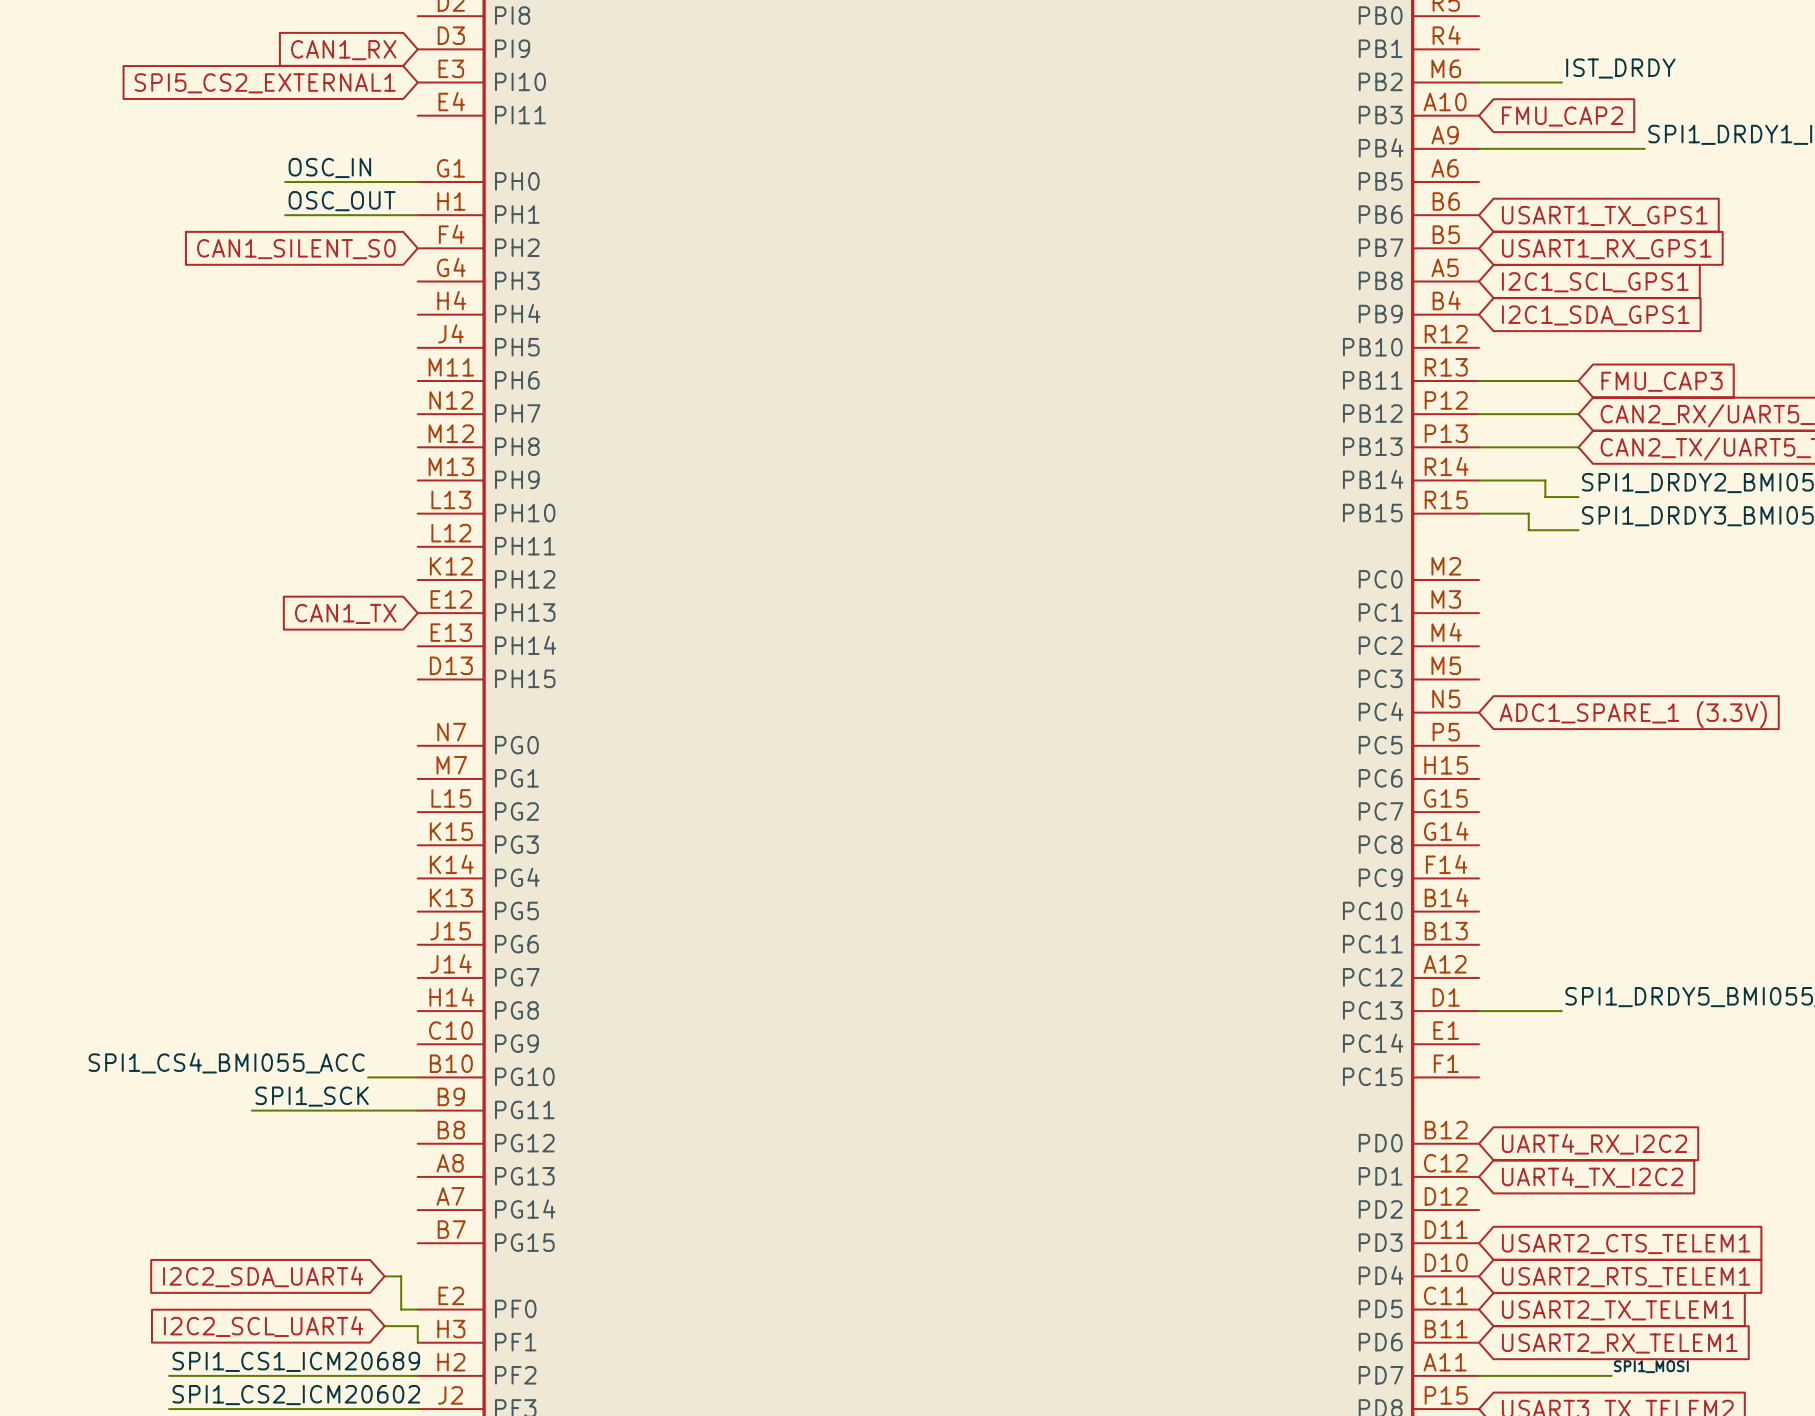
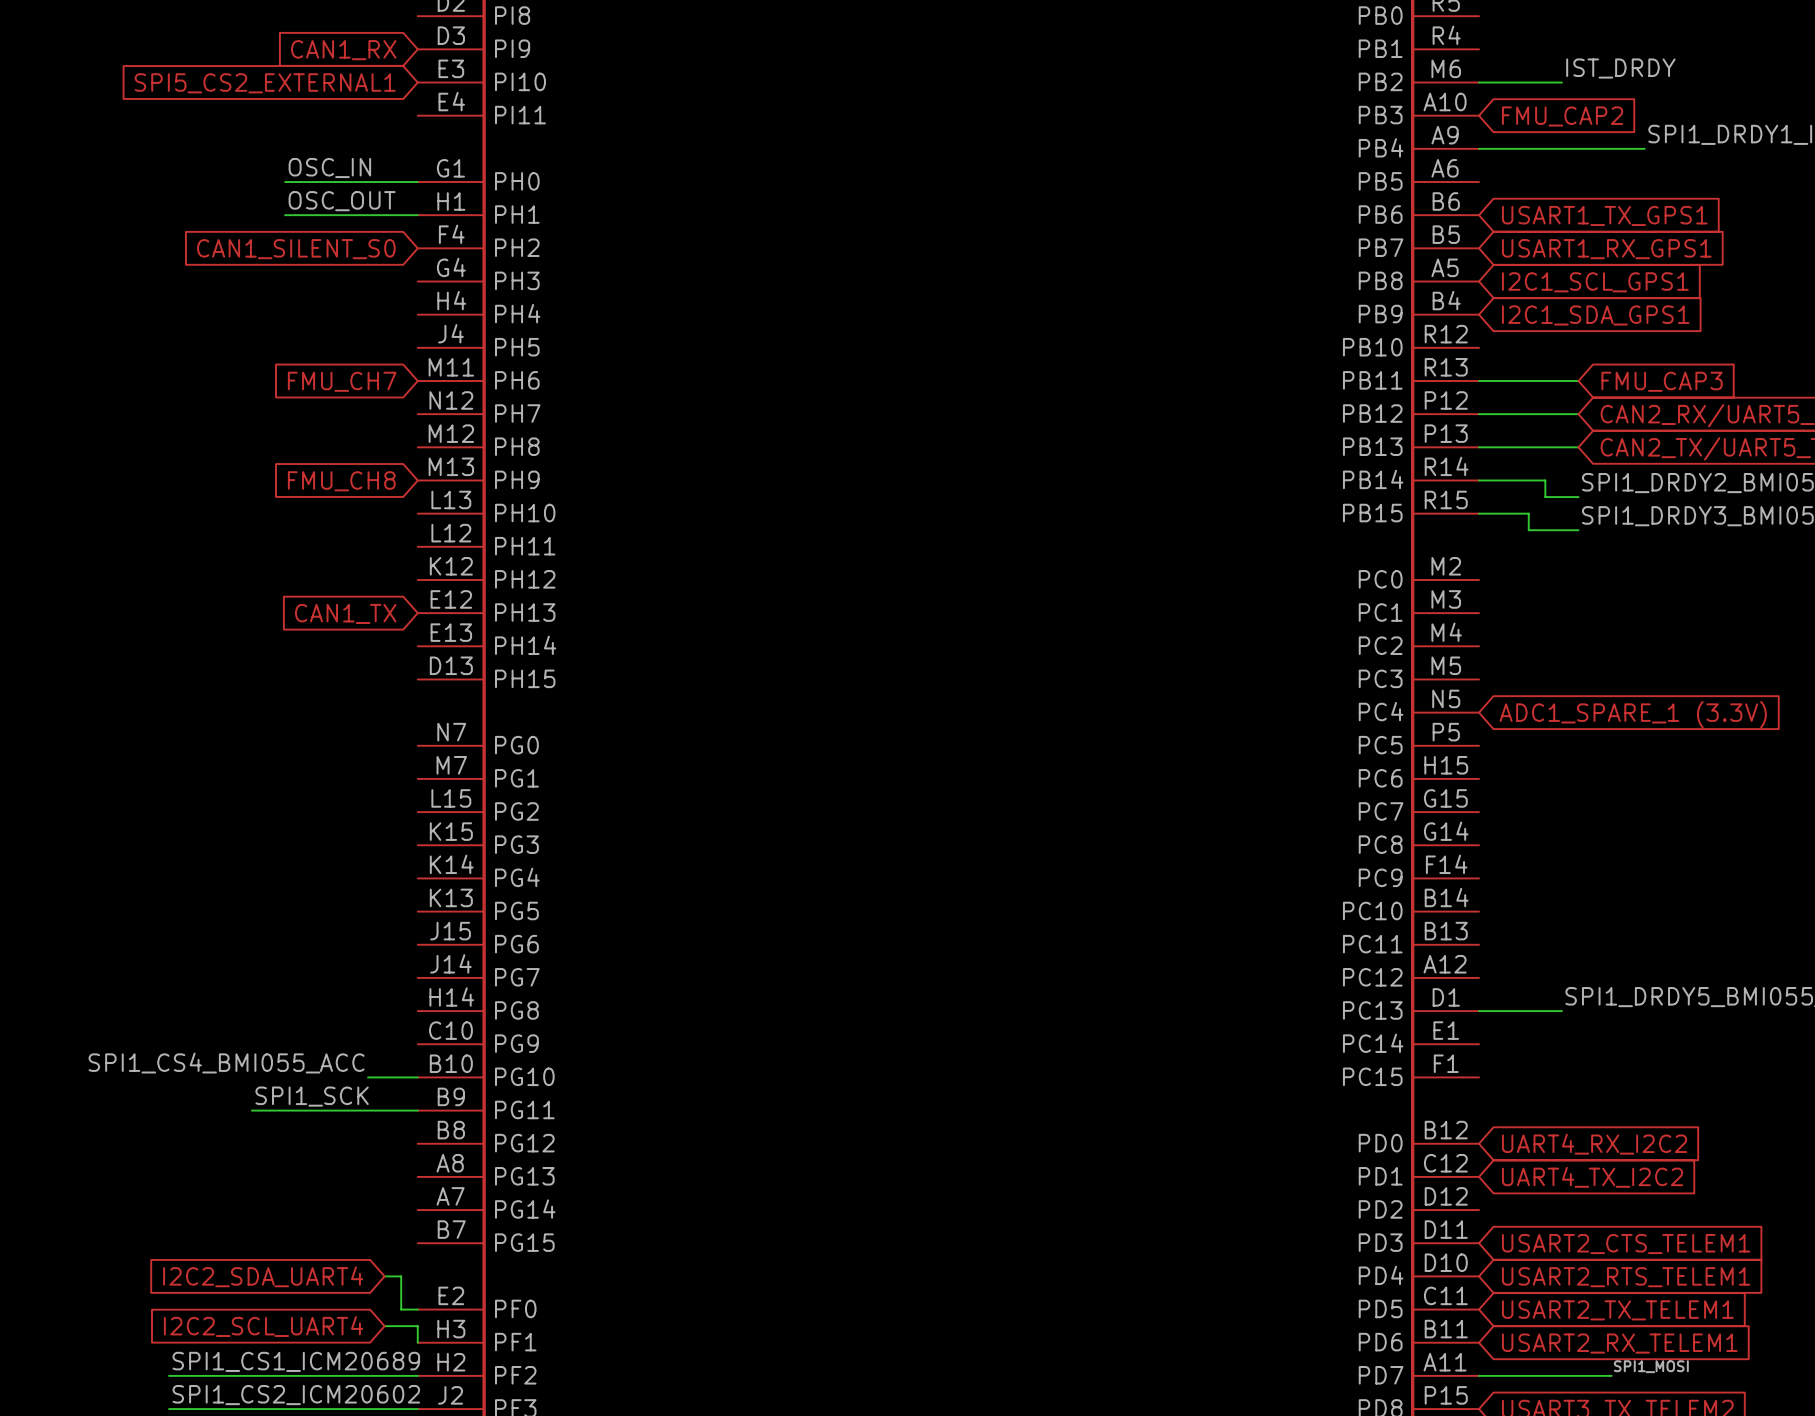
global label: none -> FMU_CH7 (342, 381)
global label: none -> FMU_CH8 (341, 481)

